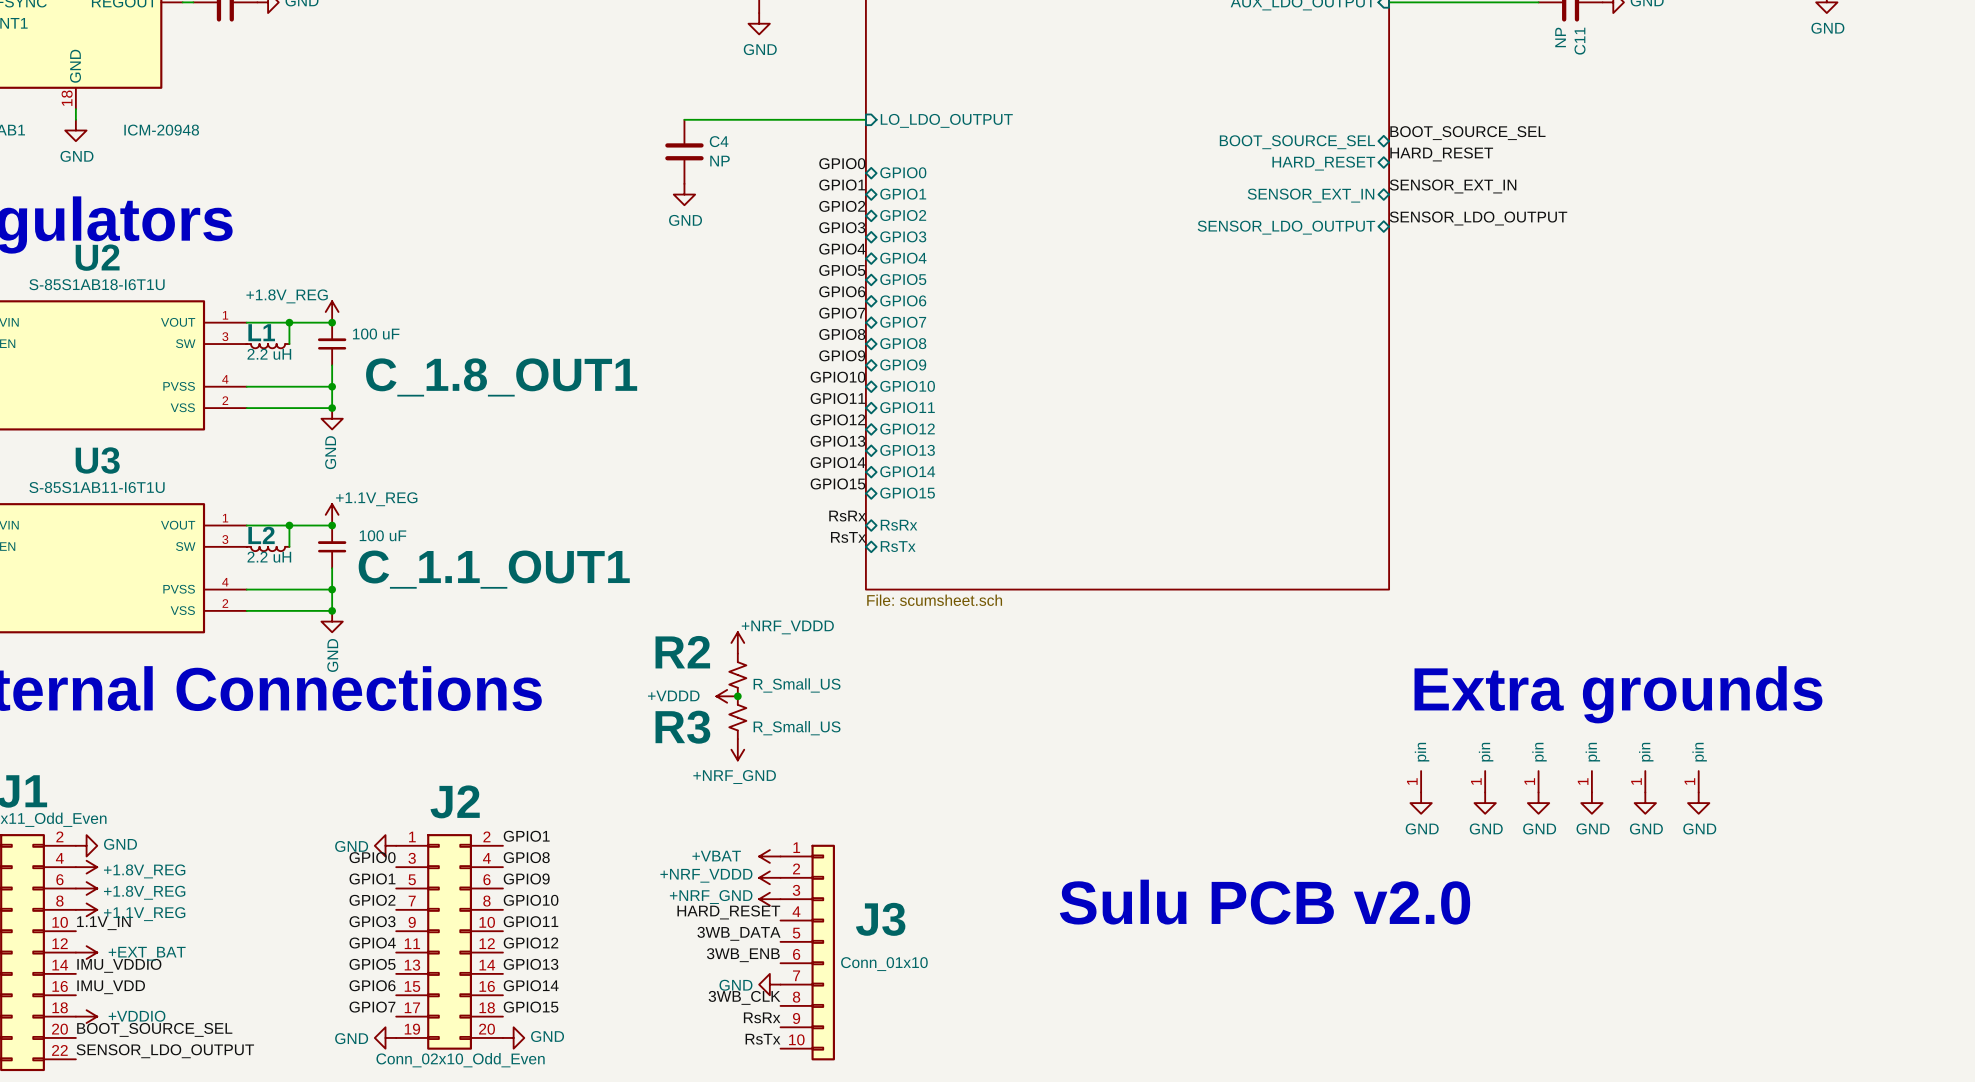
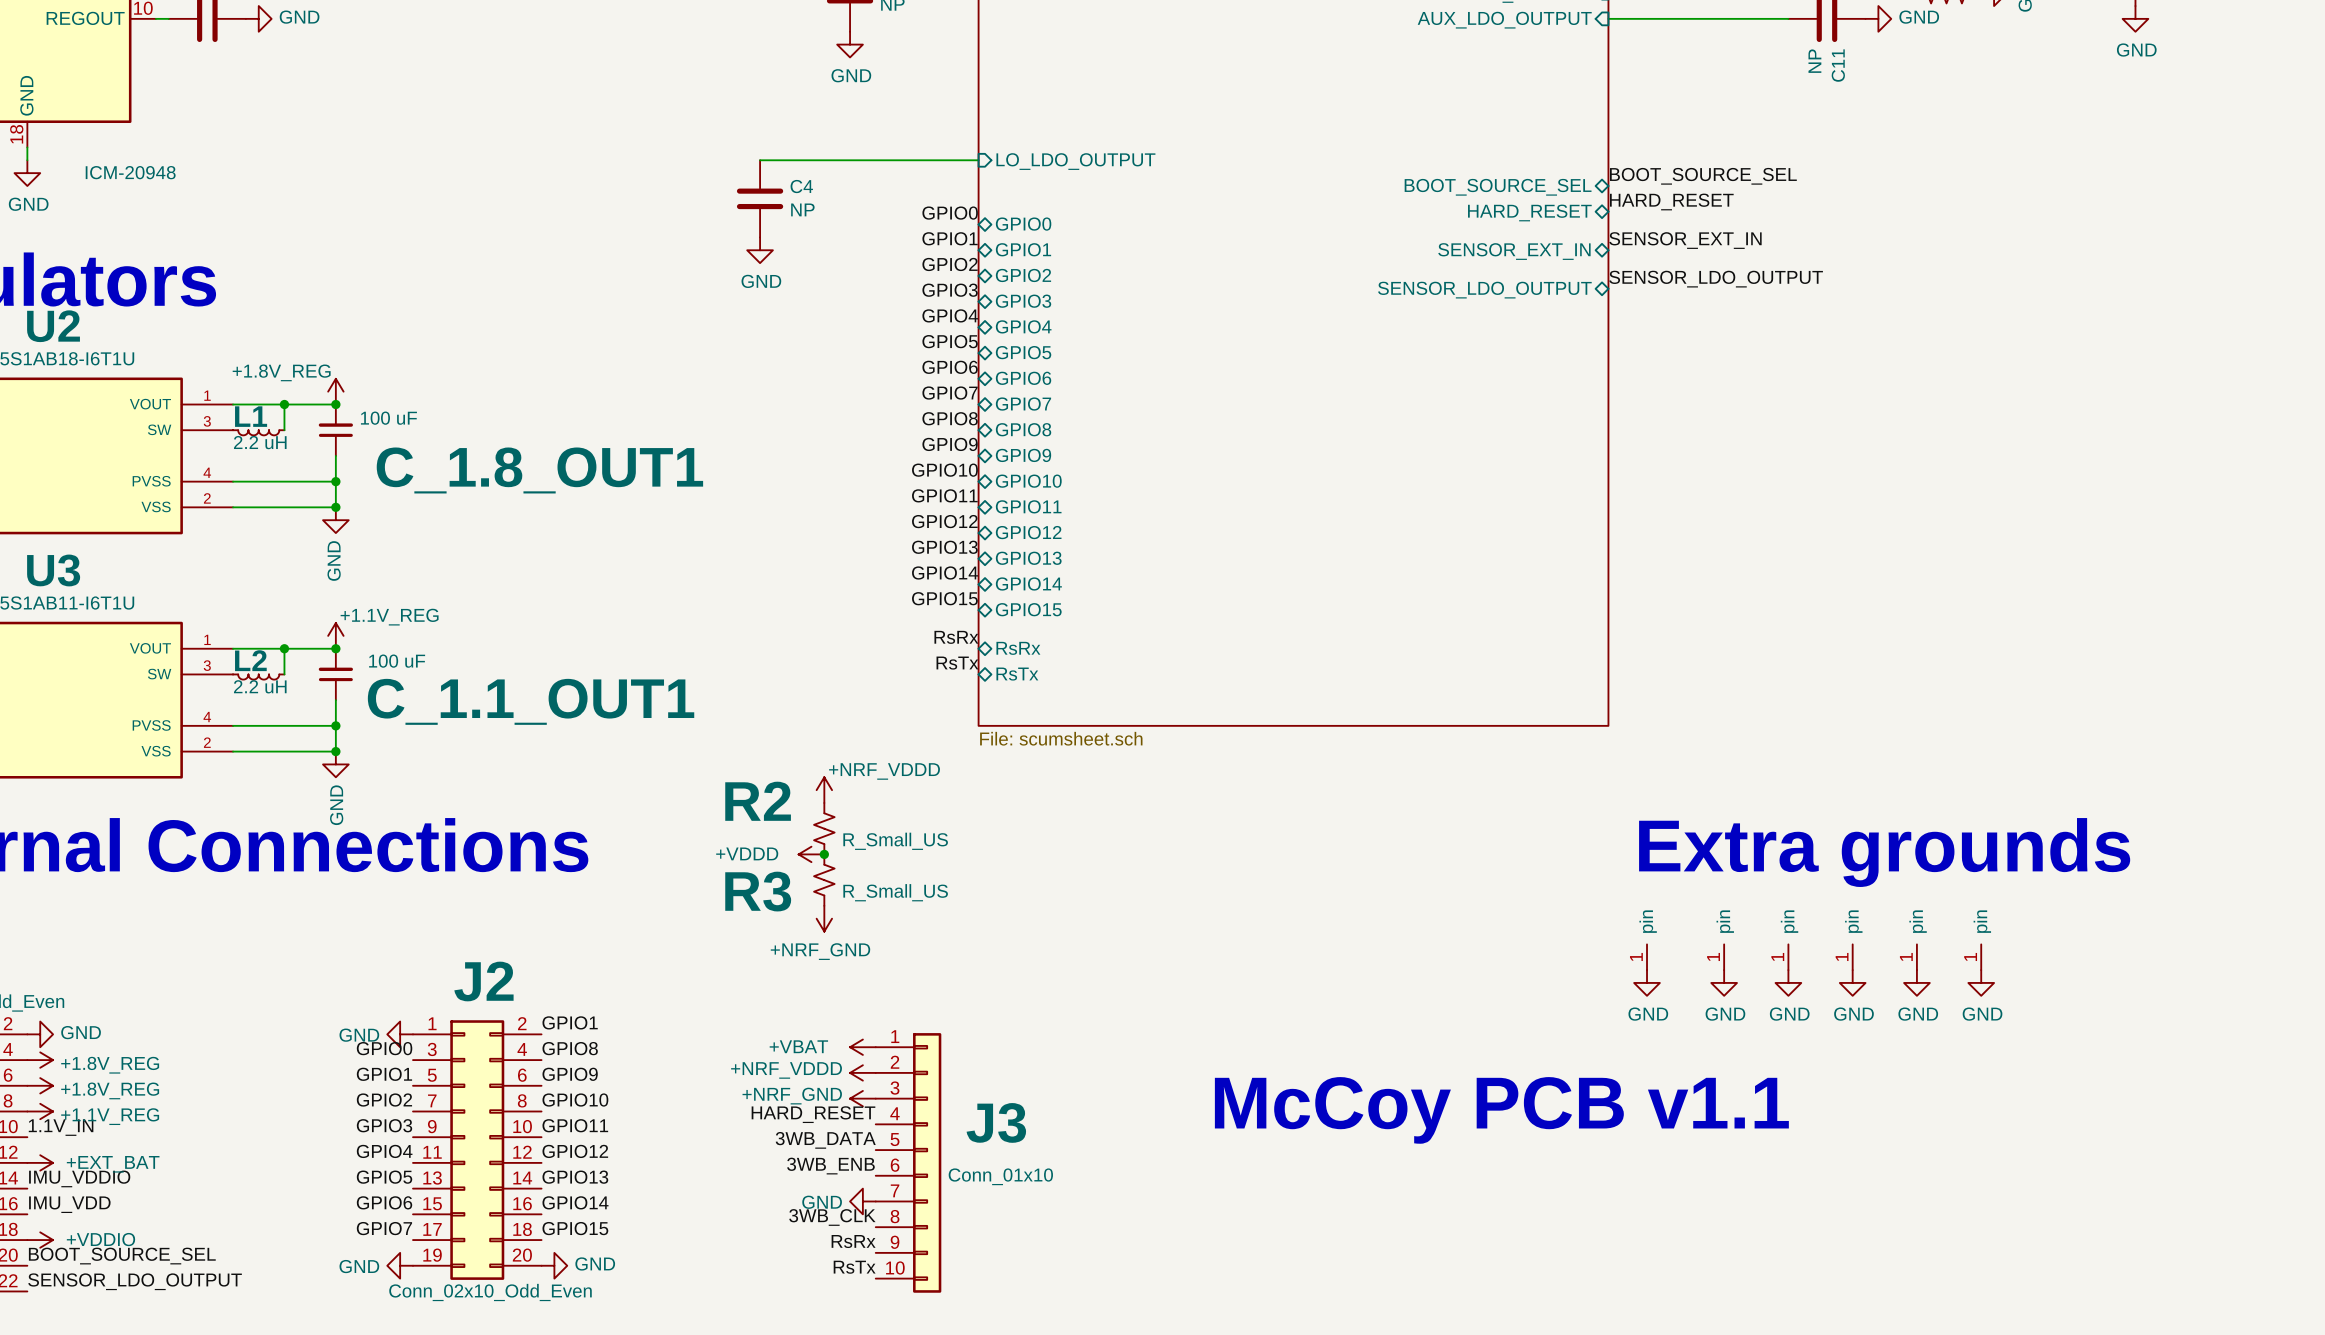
text: Sulu PCB v2.0 (1265, 902) -> McCoy PCB v1.1 (1501, 1110)

